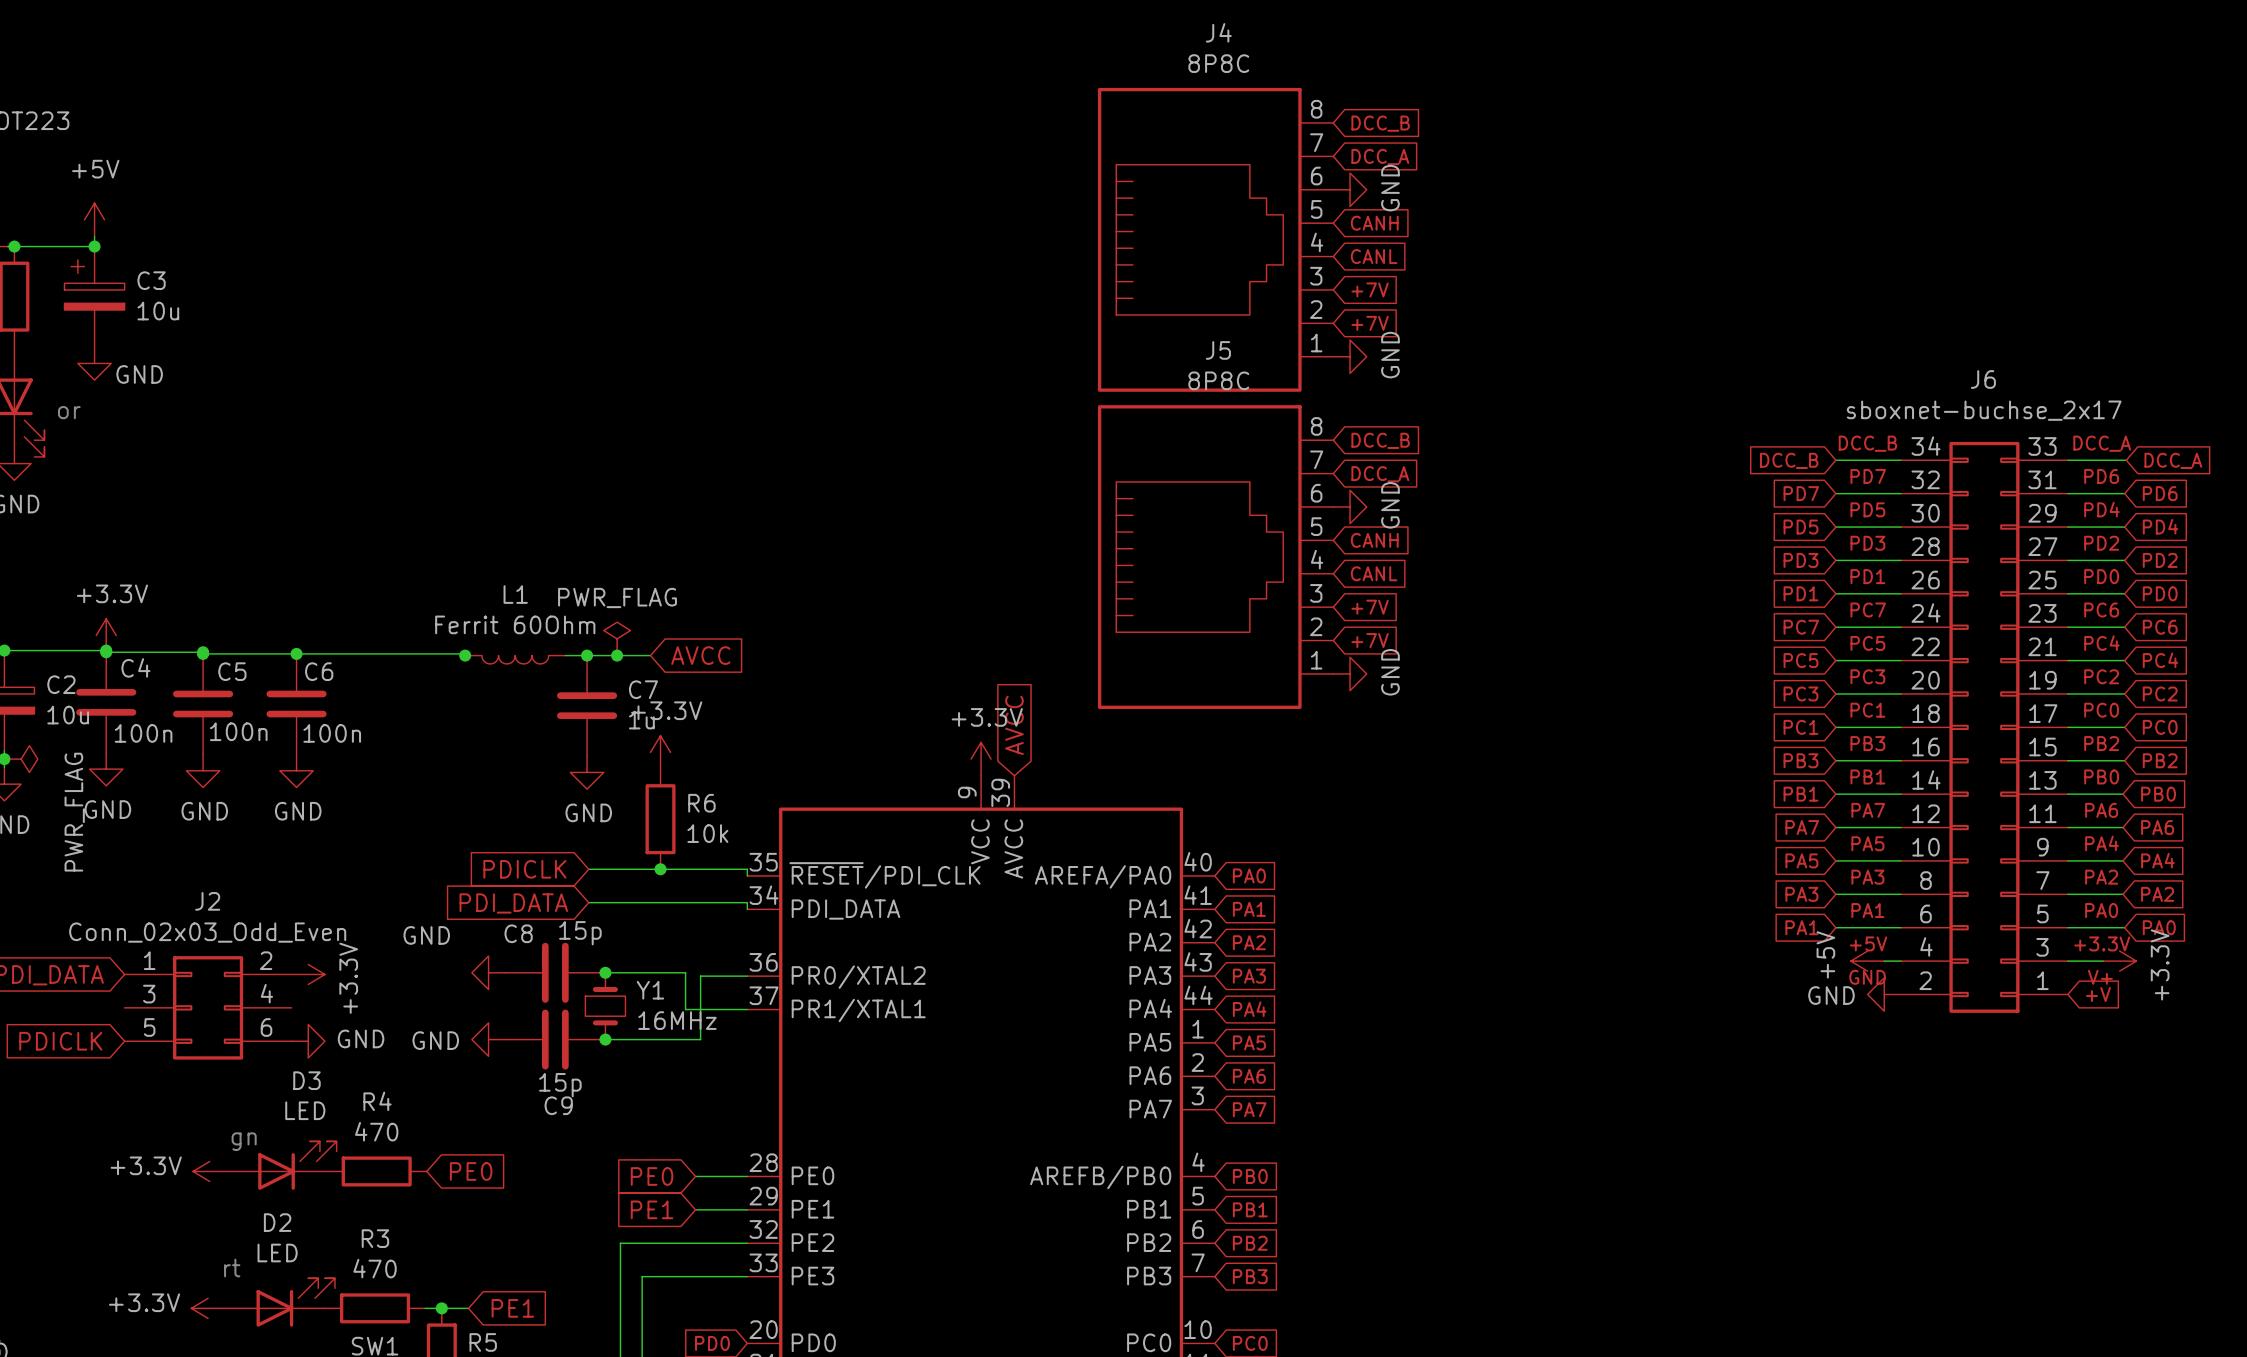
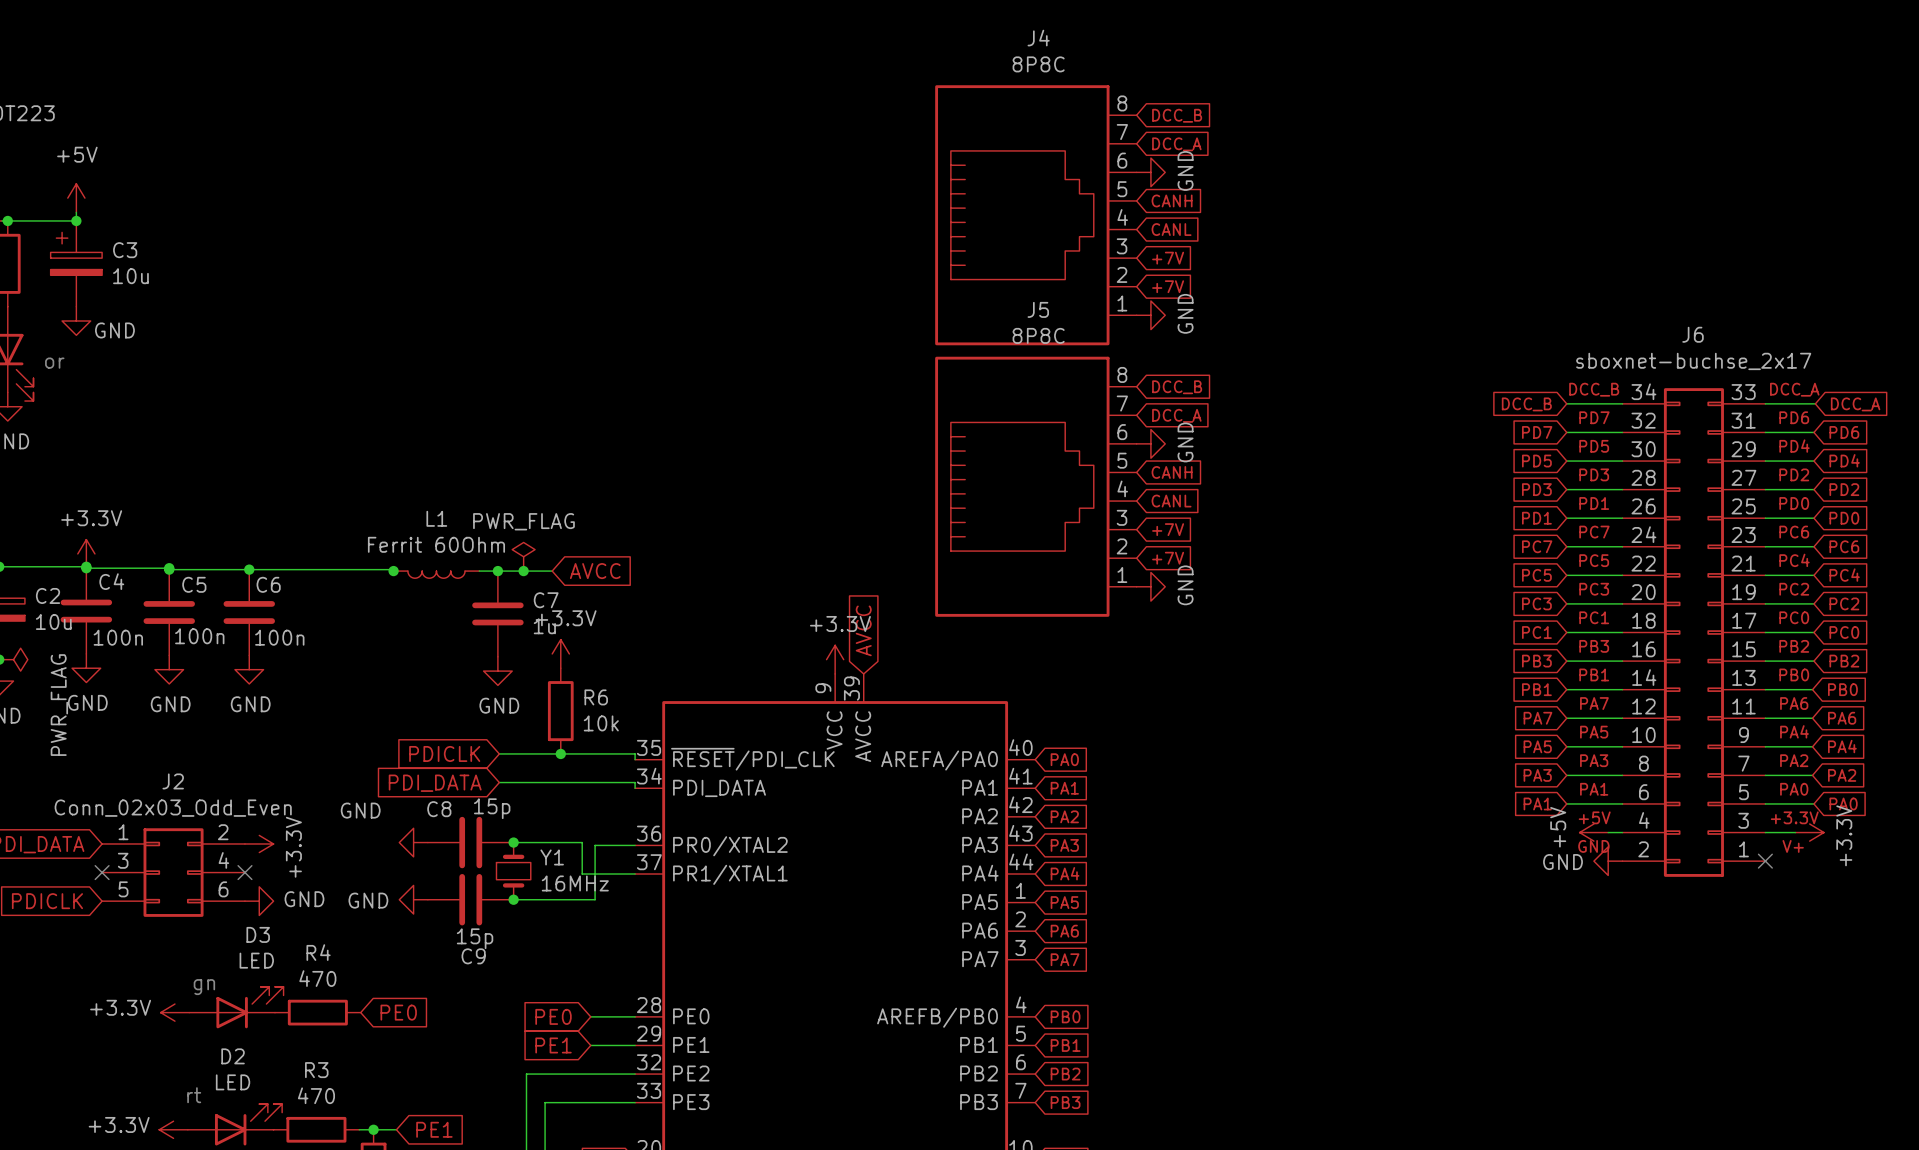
no-connect mark: none -> (1765, 861)
global label: +V (2098, 994) -> none
no-connect mark: none -> (102, 872)
no-connect mark: none -> (244, 872)

